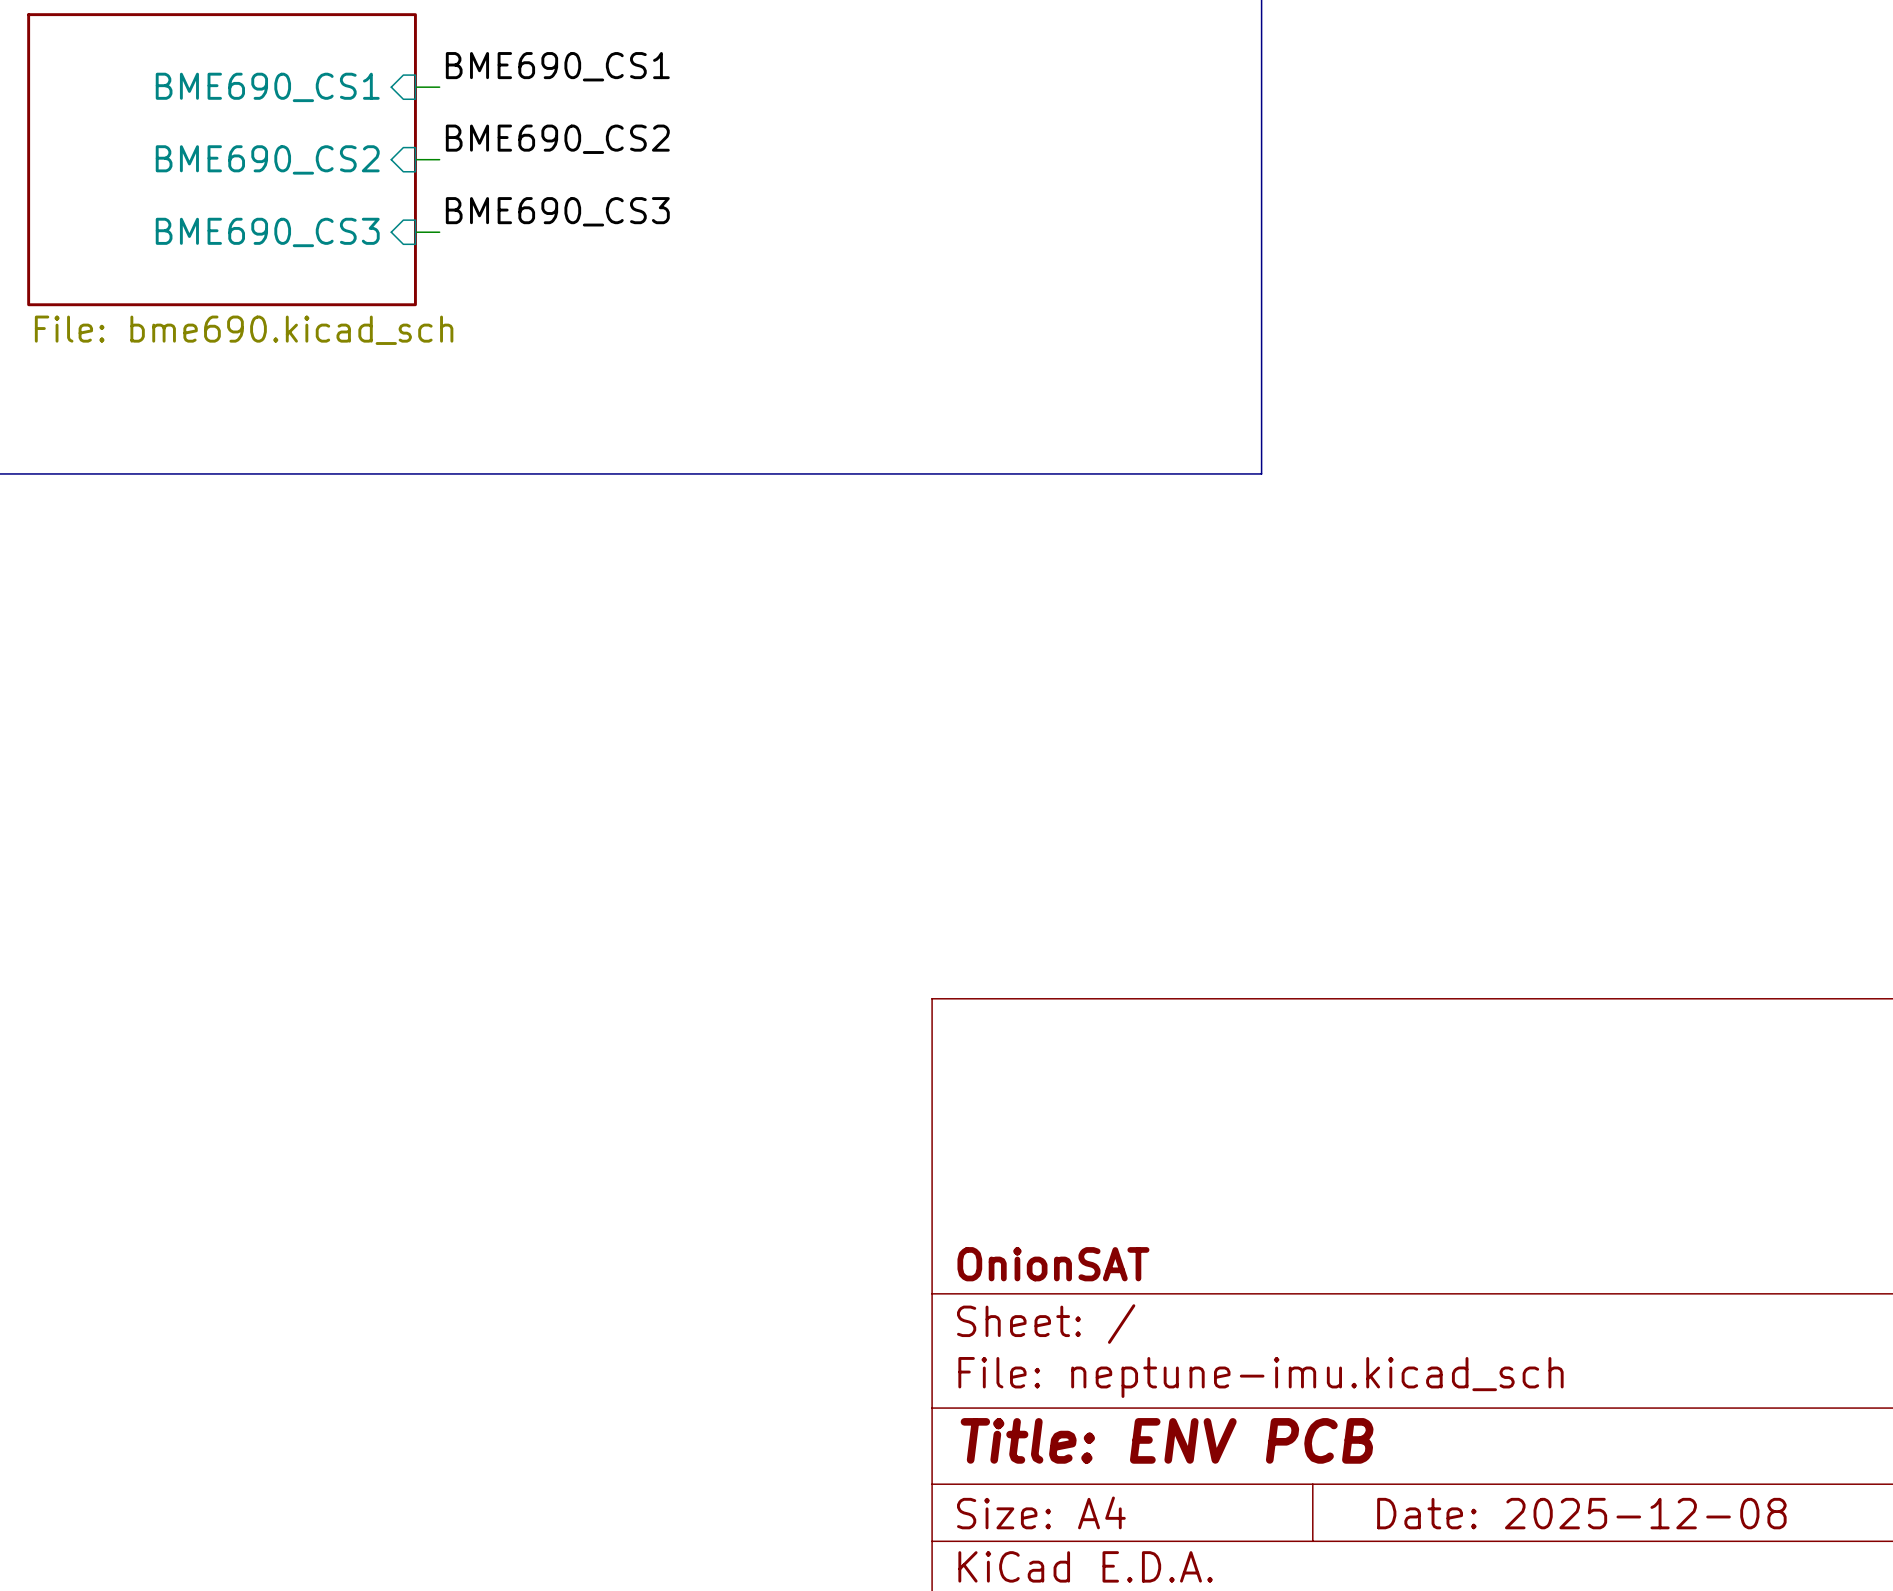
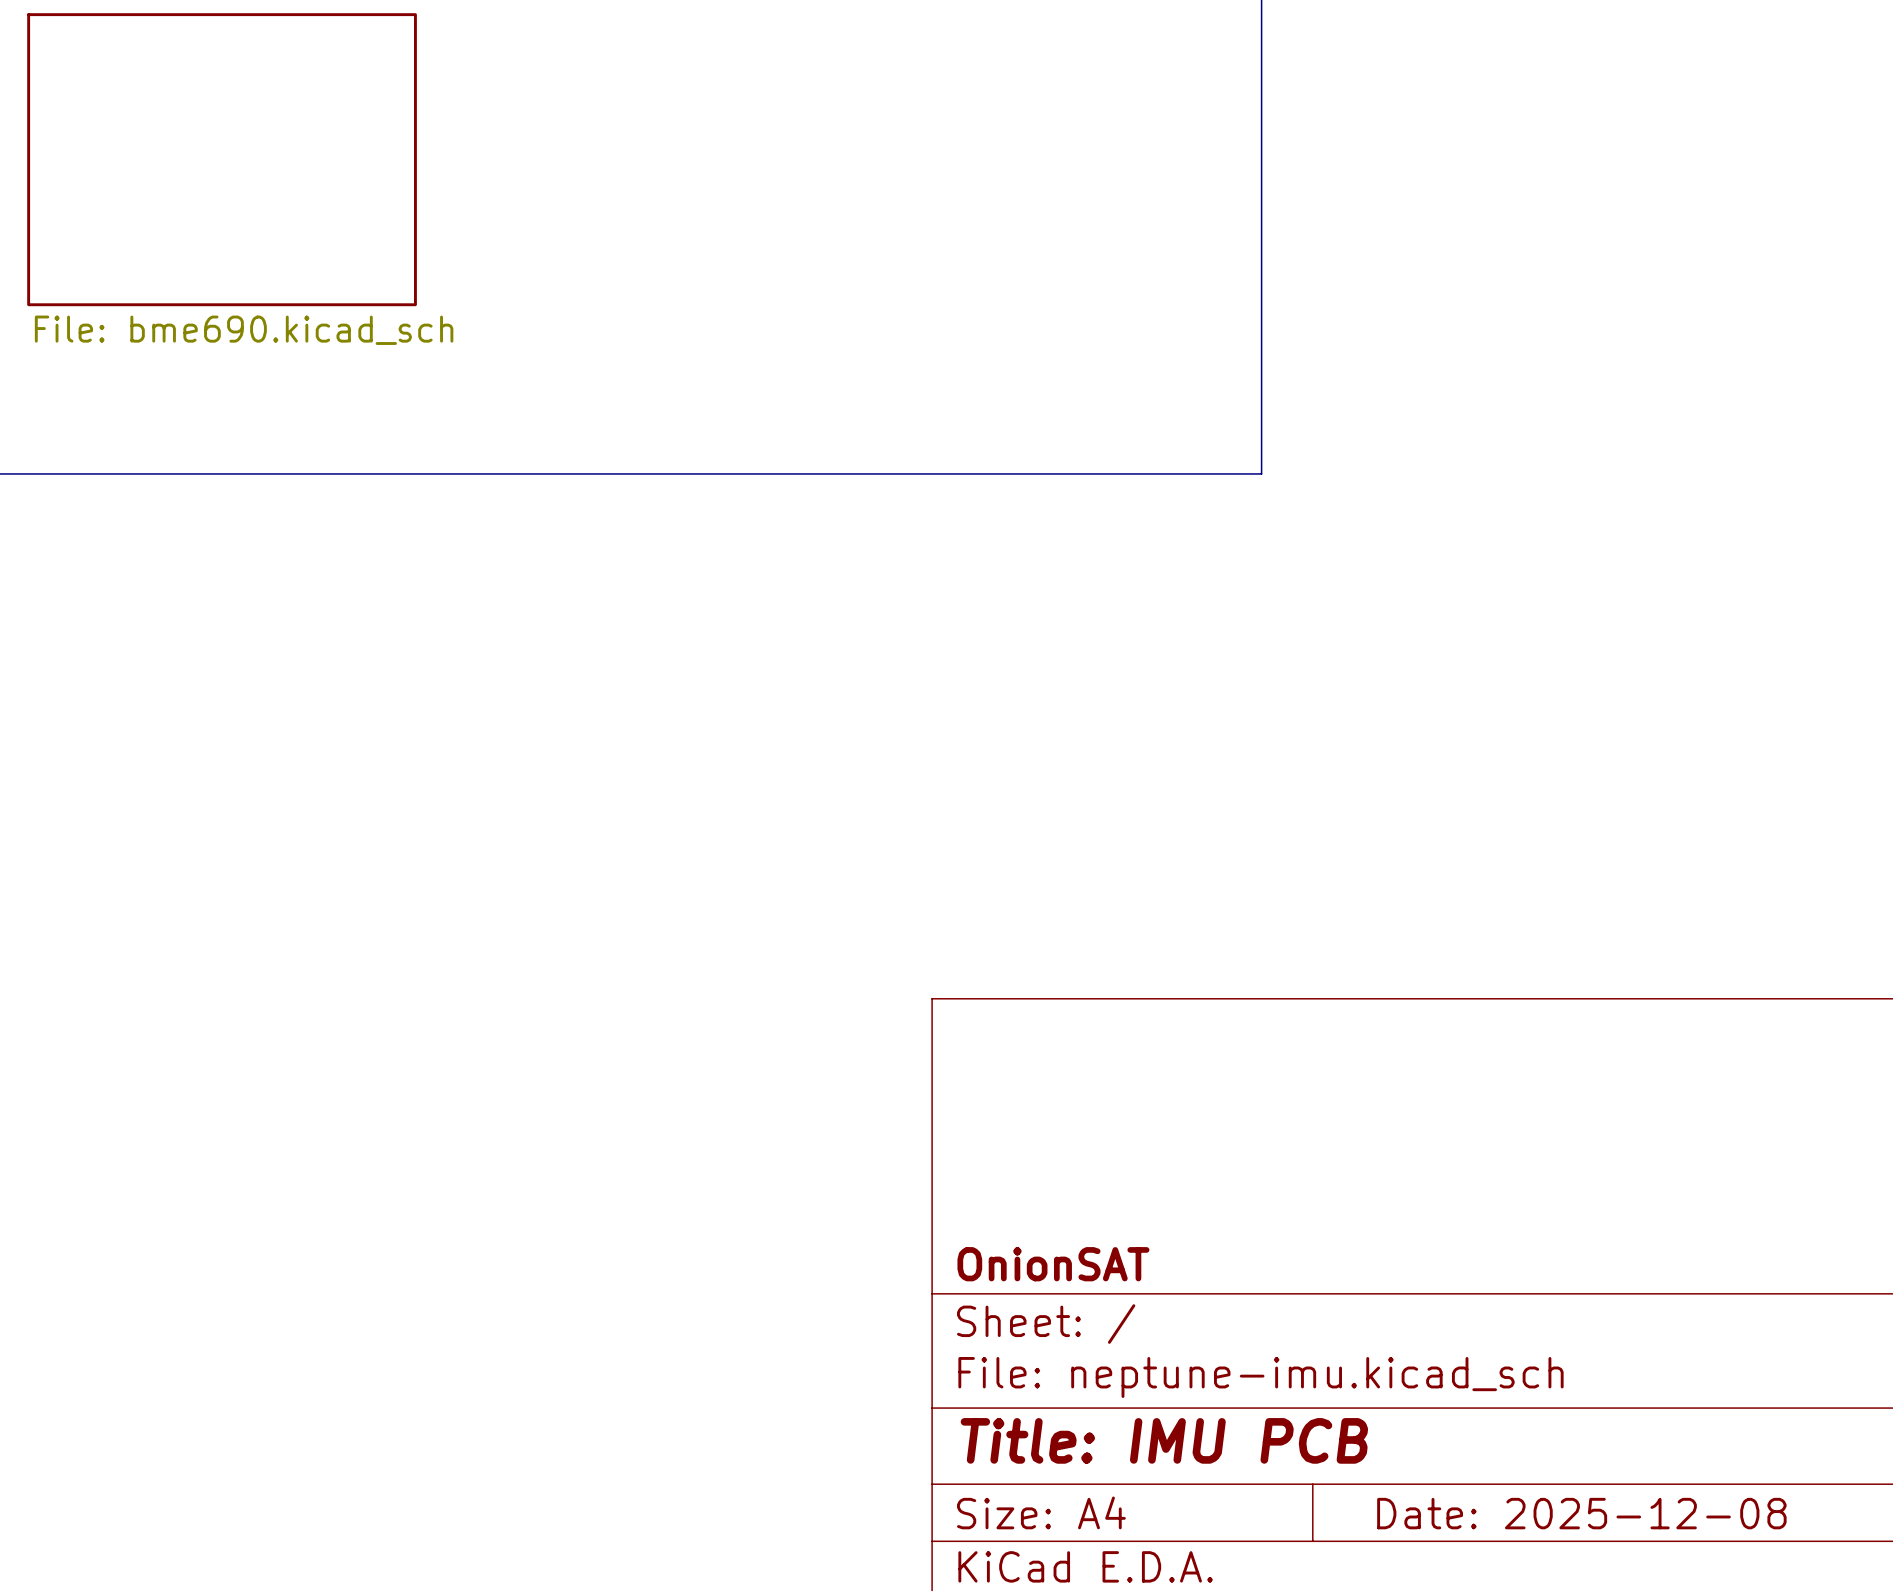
label: BME690_CS1 (557, 66) -> none
sheet pin: BME690_CS1 (267, 87) -> none
wire: (415, 87) (439, 87) -> none
label: BME690_CS2 (557, 139) -> none
sheet pin: BME690_CS2 (267, 159) -> none
wire: (415, 159) (439, 159) -> none
label: BME690_CS3 (557, 211) -> none
sheet pin: BME690_CS3 (267, 232) -> none
wire: (415, 232) (439, 232) -> none
title block: Title: ENV PCB (1167, 1440) -> Title: IMU PCB (1164, 1440)

